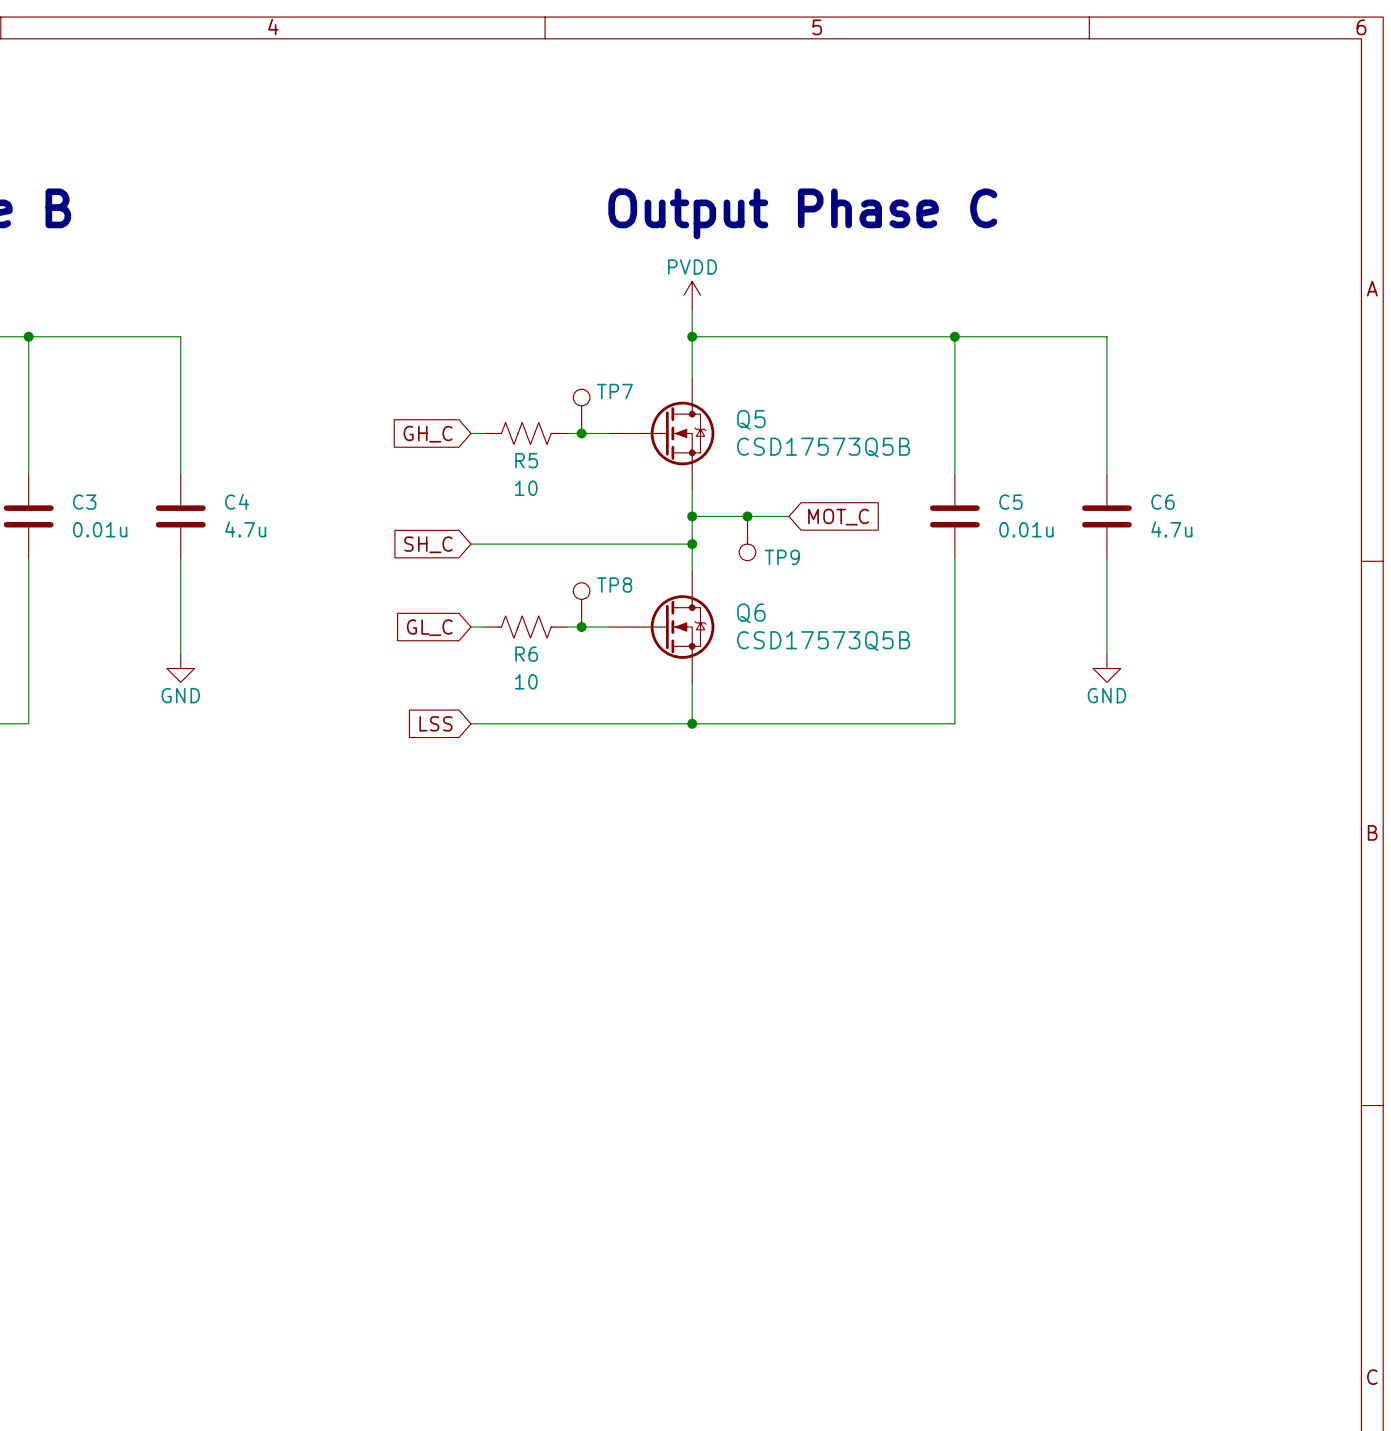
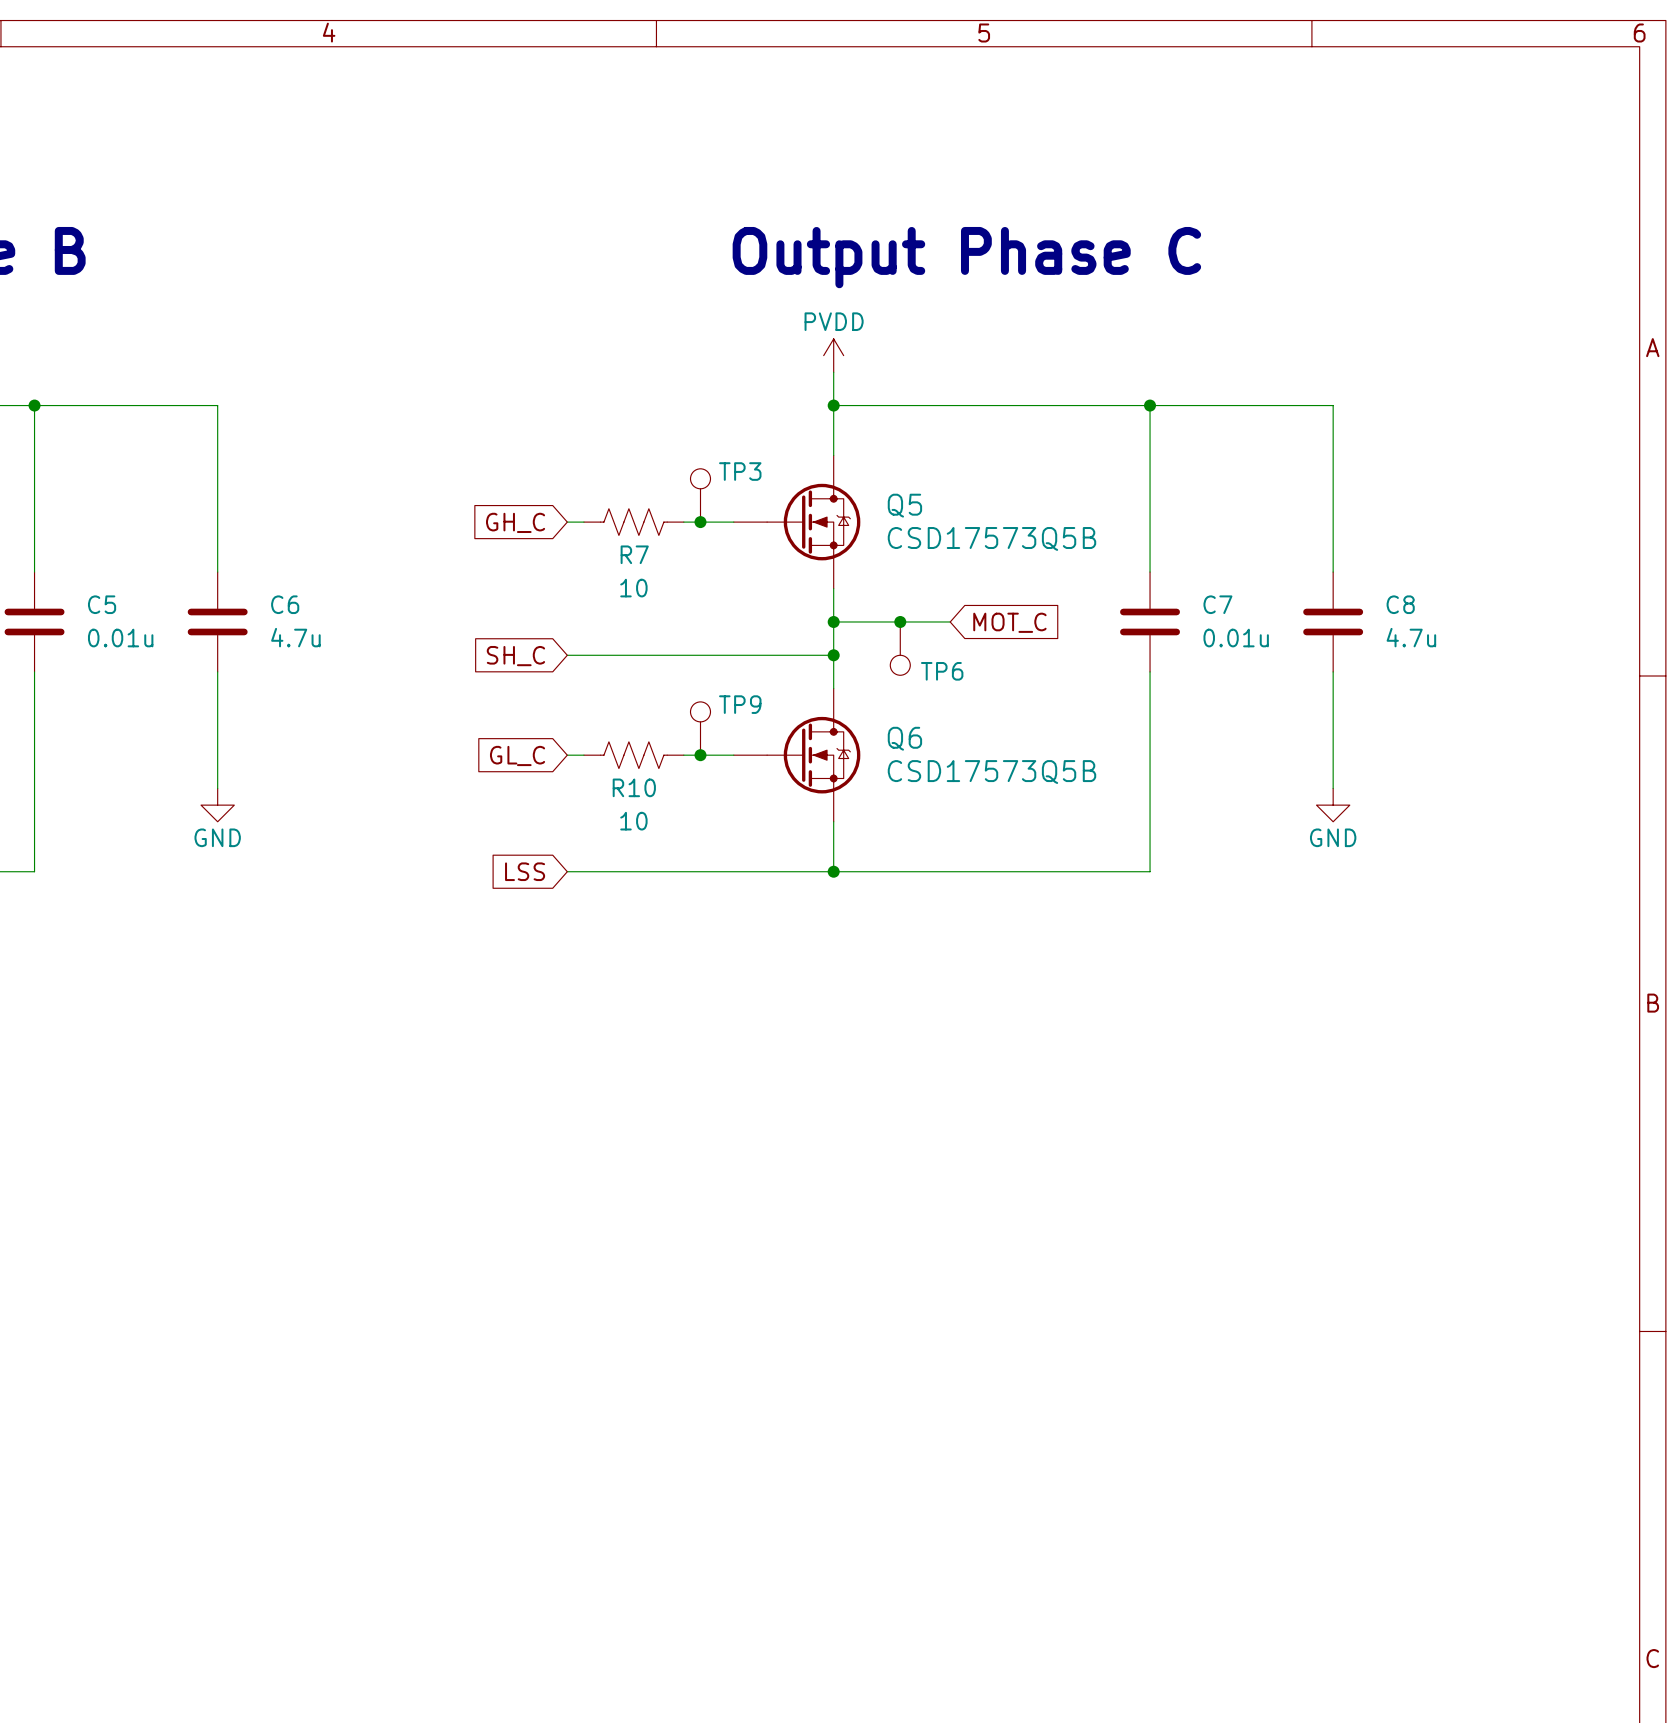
TP7 name: TP7 (614, 391) -> TP3 (740, 471)
R5 name: R5 (526, 460) -> R7 (634, 554)
C4 name: C4 (237, 501) -> C6 (285, 604)
C3 name: C3 (84, 502) -> C5 (102, 604)
C5 name: C5 (1010, 502) -> C7 (1217, 604)
C6 name: C6 (1162, 502) -> C8 (1400, 604)
TP9 name: TP9 (782, 557) -> TP6 (942, 671)
TP8 name: TP8 (614, 585) -> TP9 (740, 704)
R6 name: R6 (526, 654) -> R10 (634, 787)

